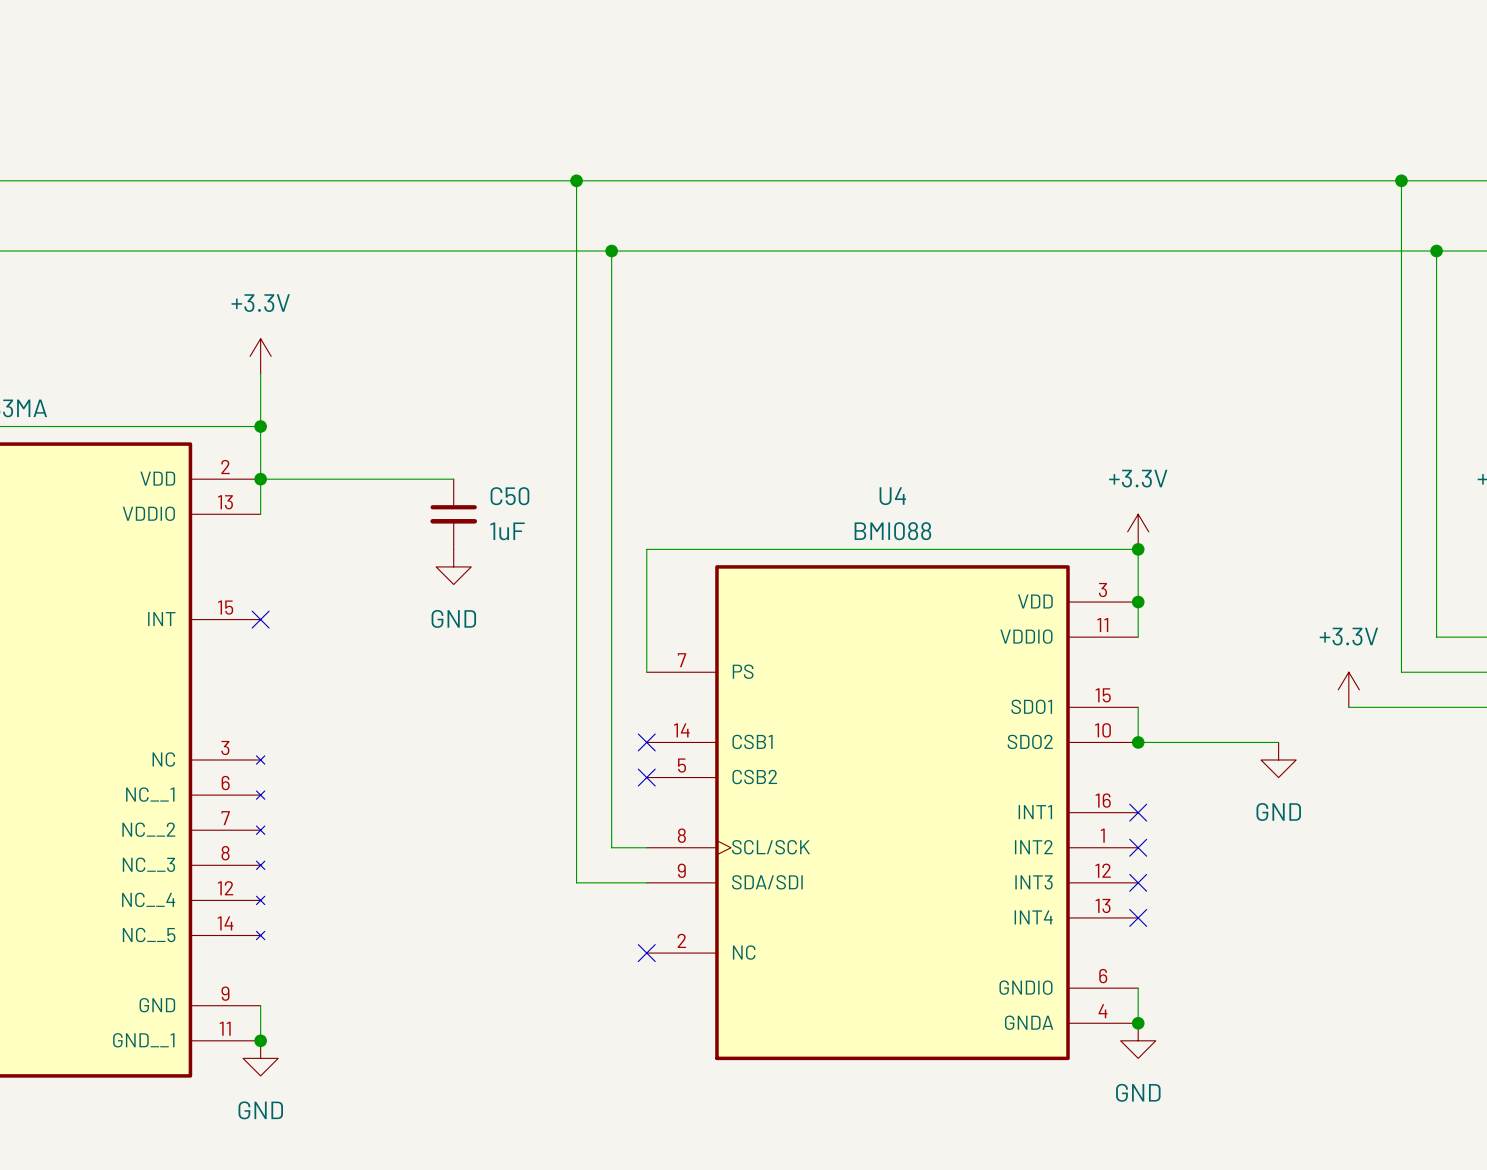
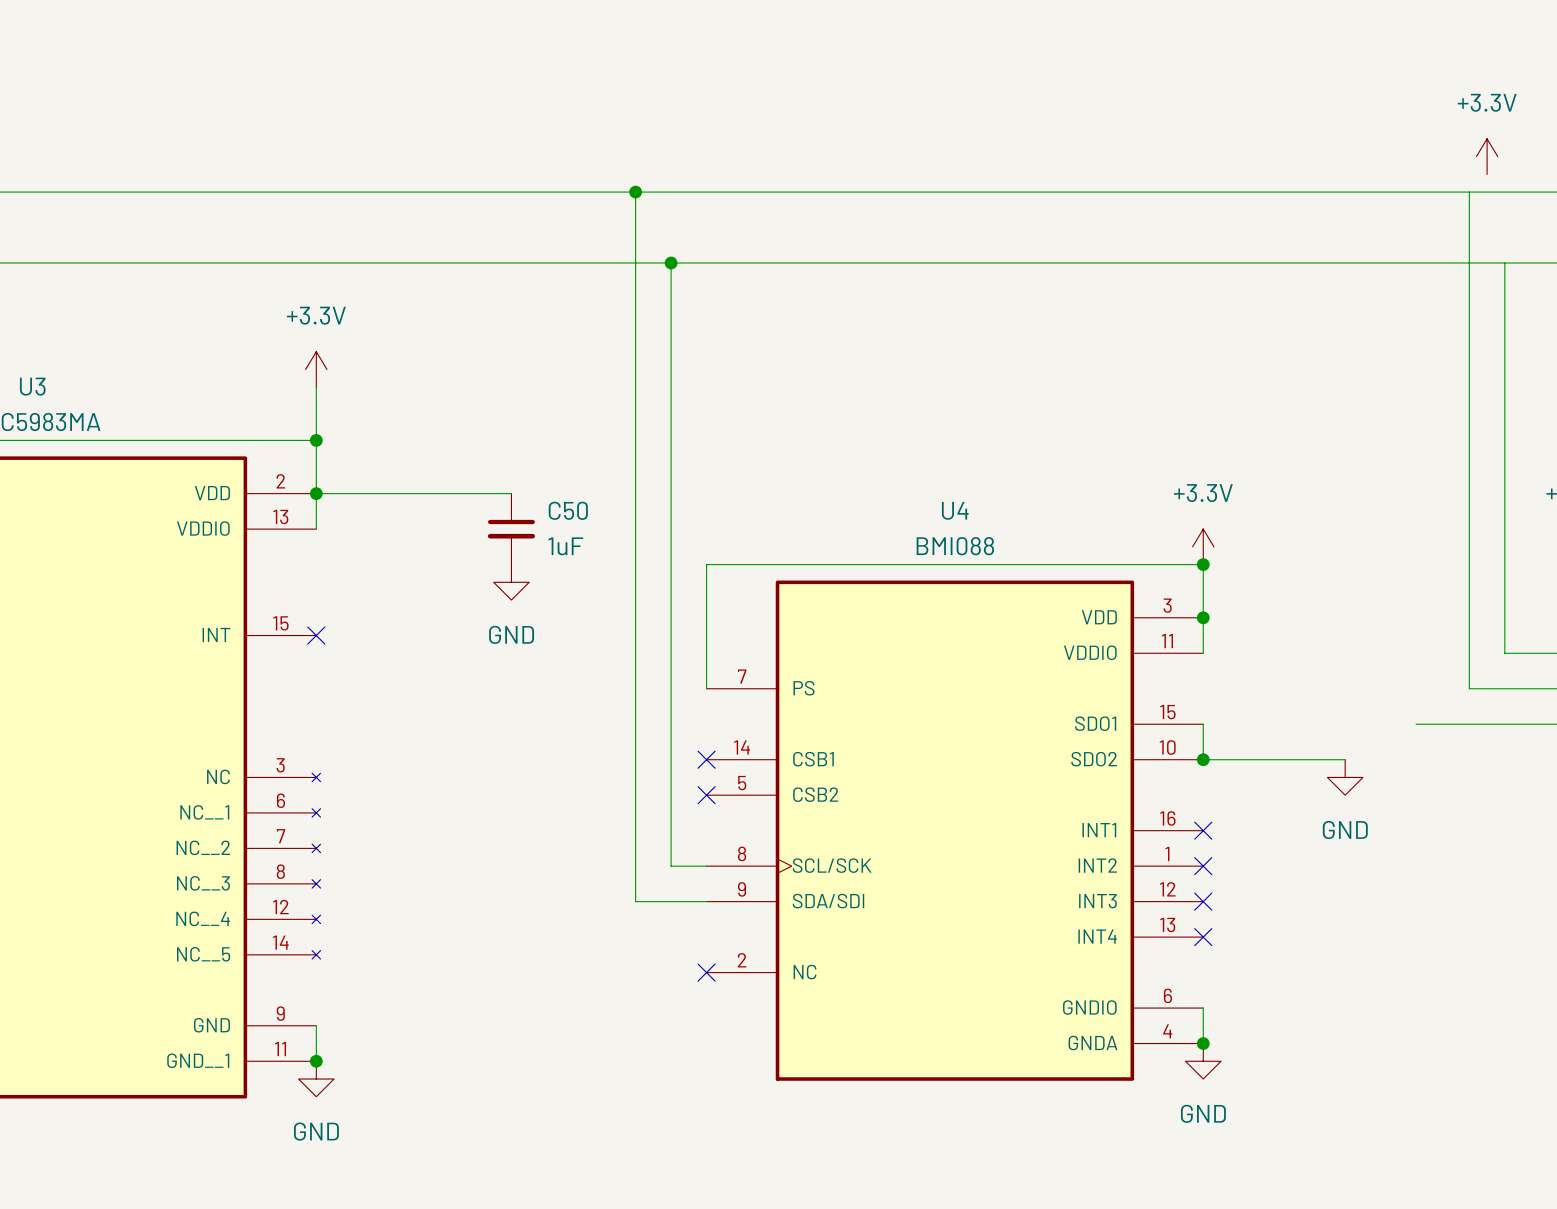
power symbol: none -> +3.3V (1487, 156)
junction: (1401, 180) -> none
junction: (1436, 251) -> none
power symbol: +3.3V (1348, 689) -> none

